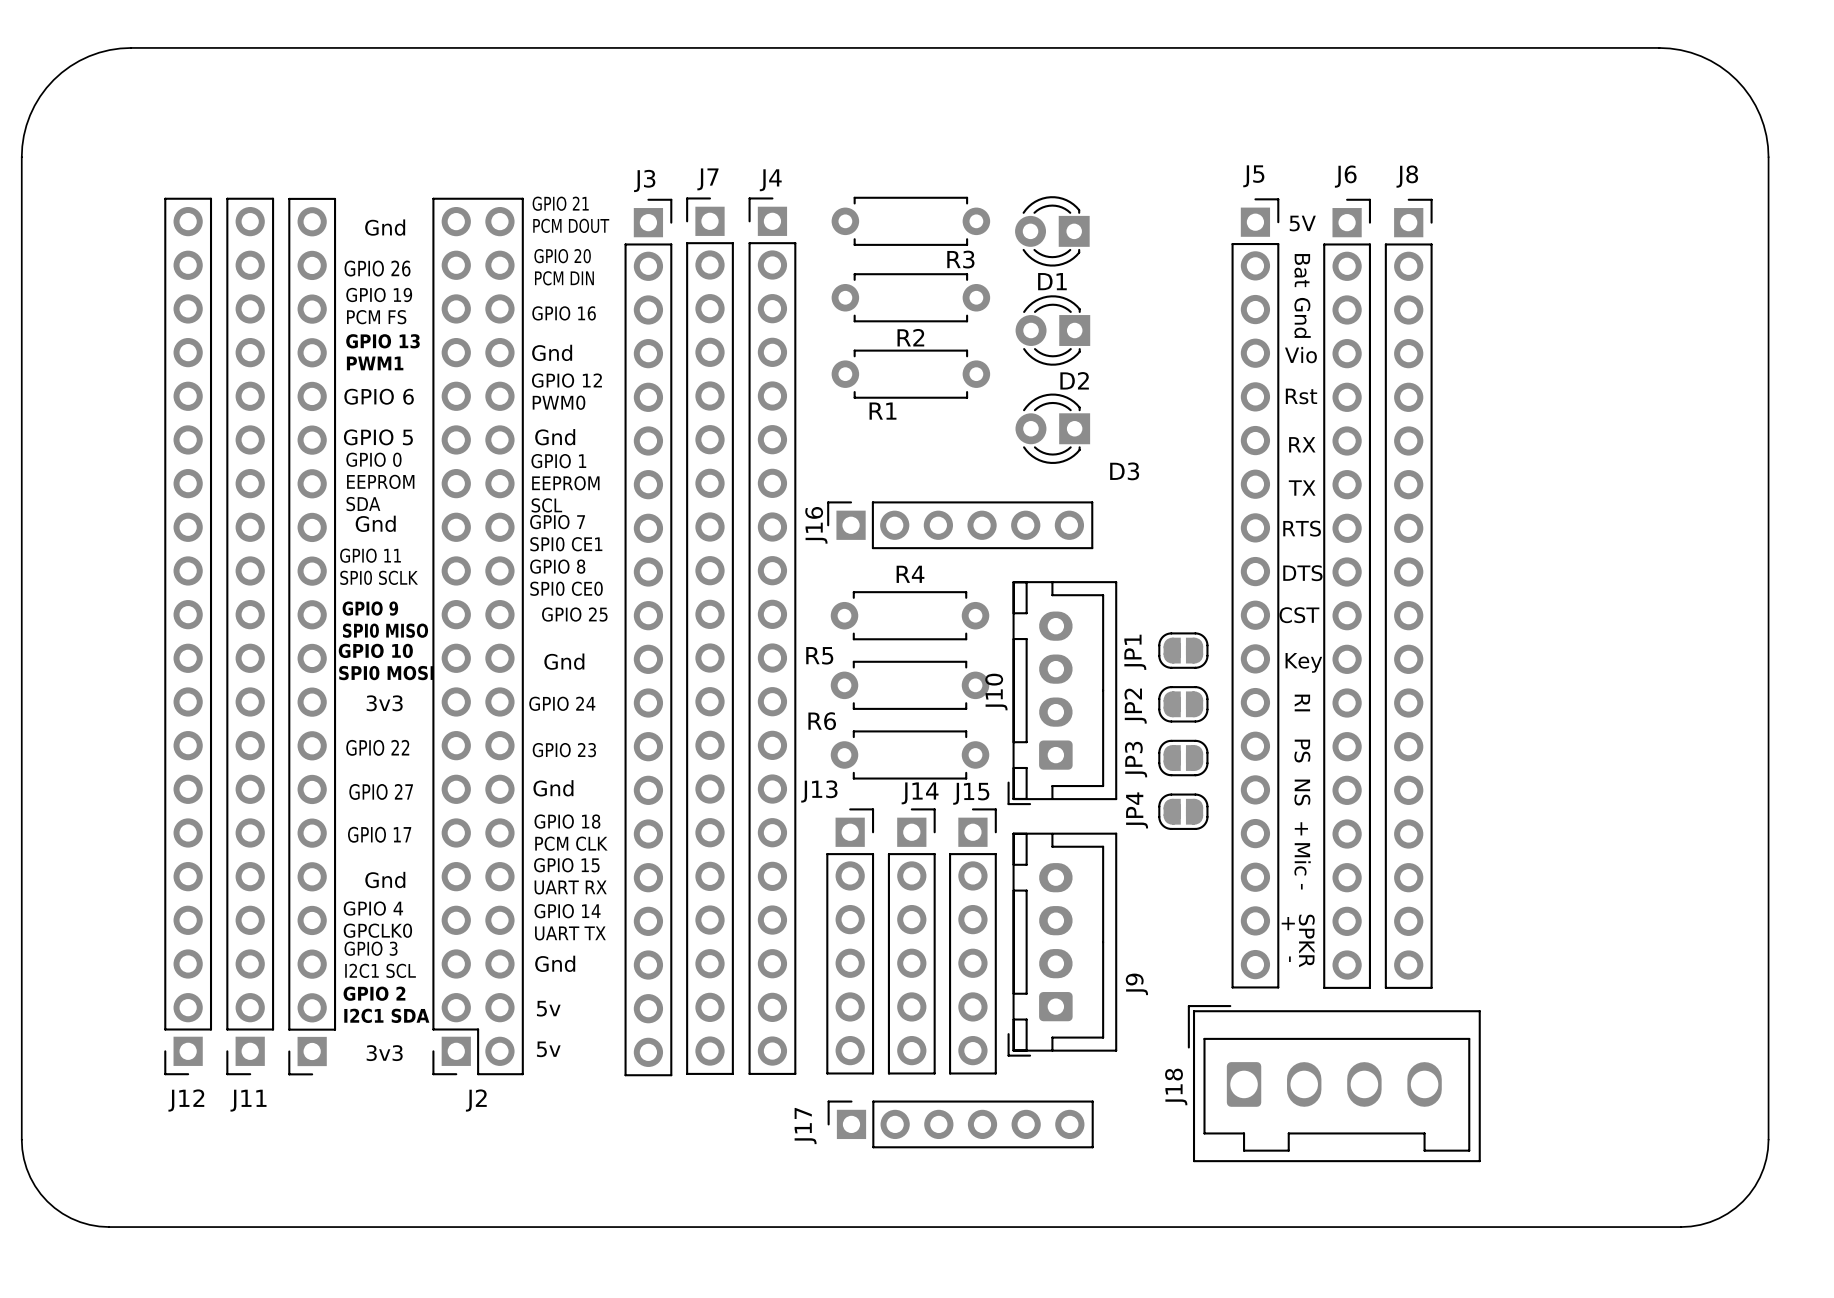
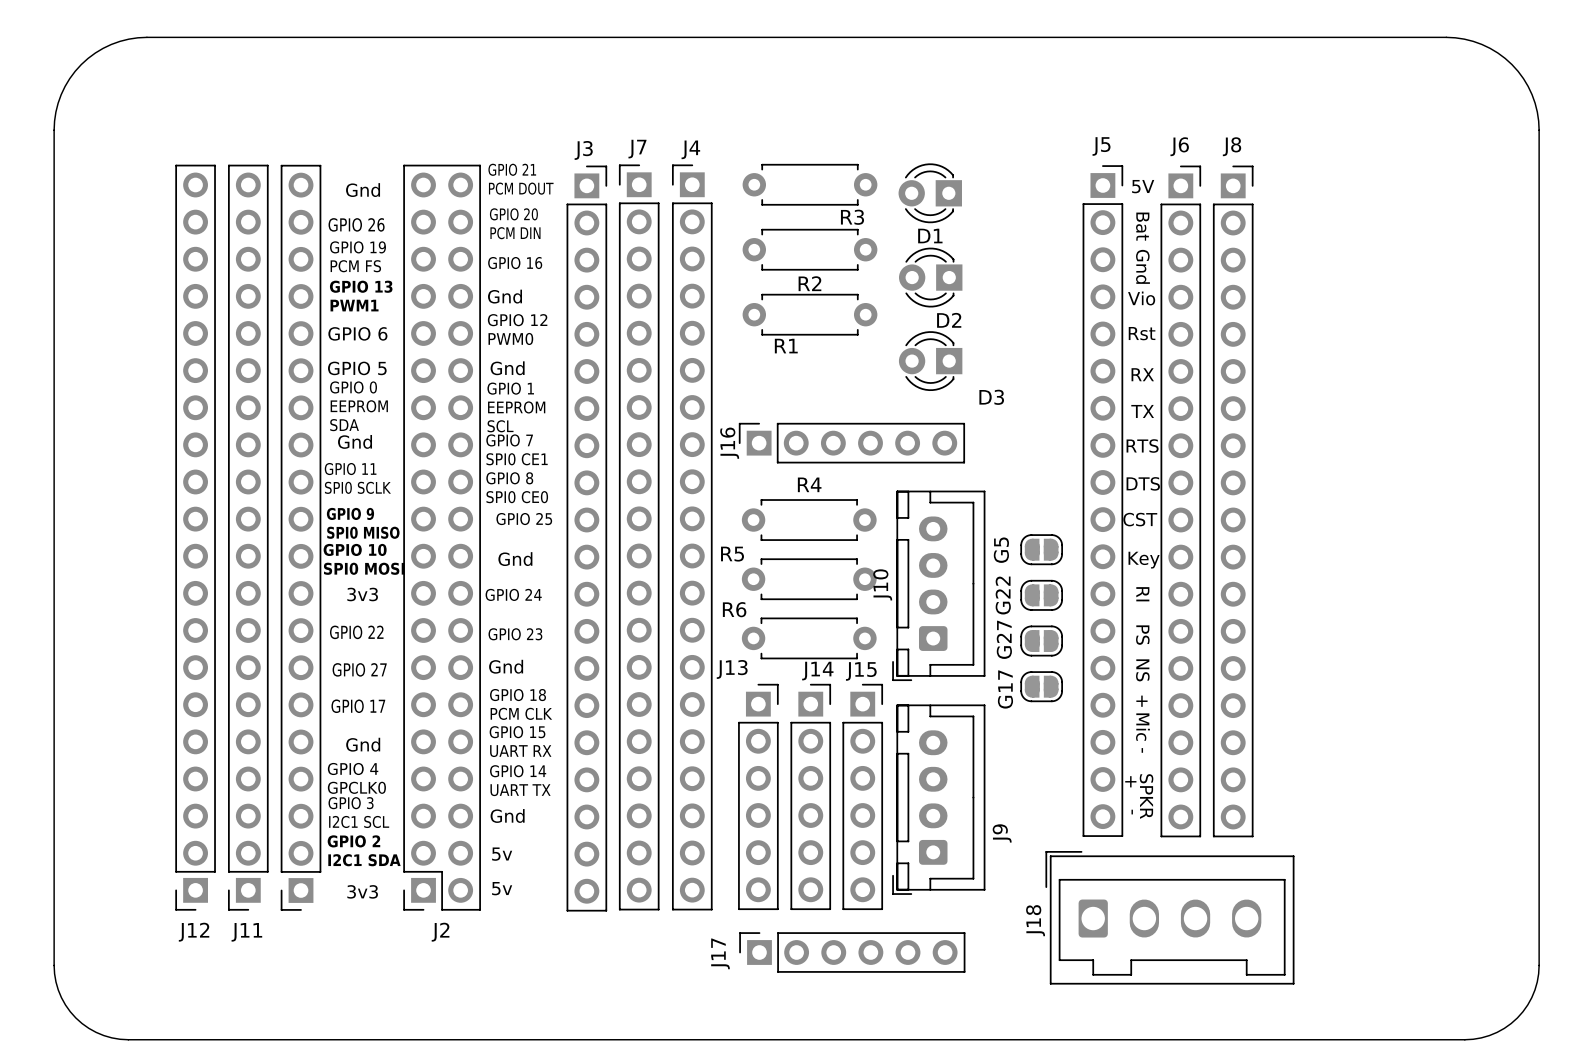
JP1 name: JP1 (1135, 652) -> G5 (1001, 550)
JP2 name: JP2 (1135, 706) -> G22 (1003, 595)
JP3 name: JP3 (1136, 759) -> G27 (1004, 639)
JP4 name: JP4 (1137, 810) -> G17 (1005, 689)

